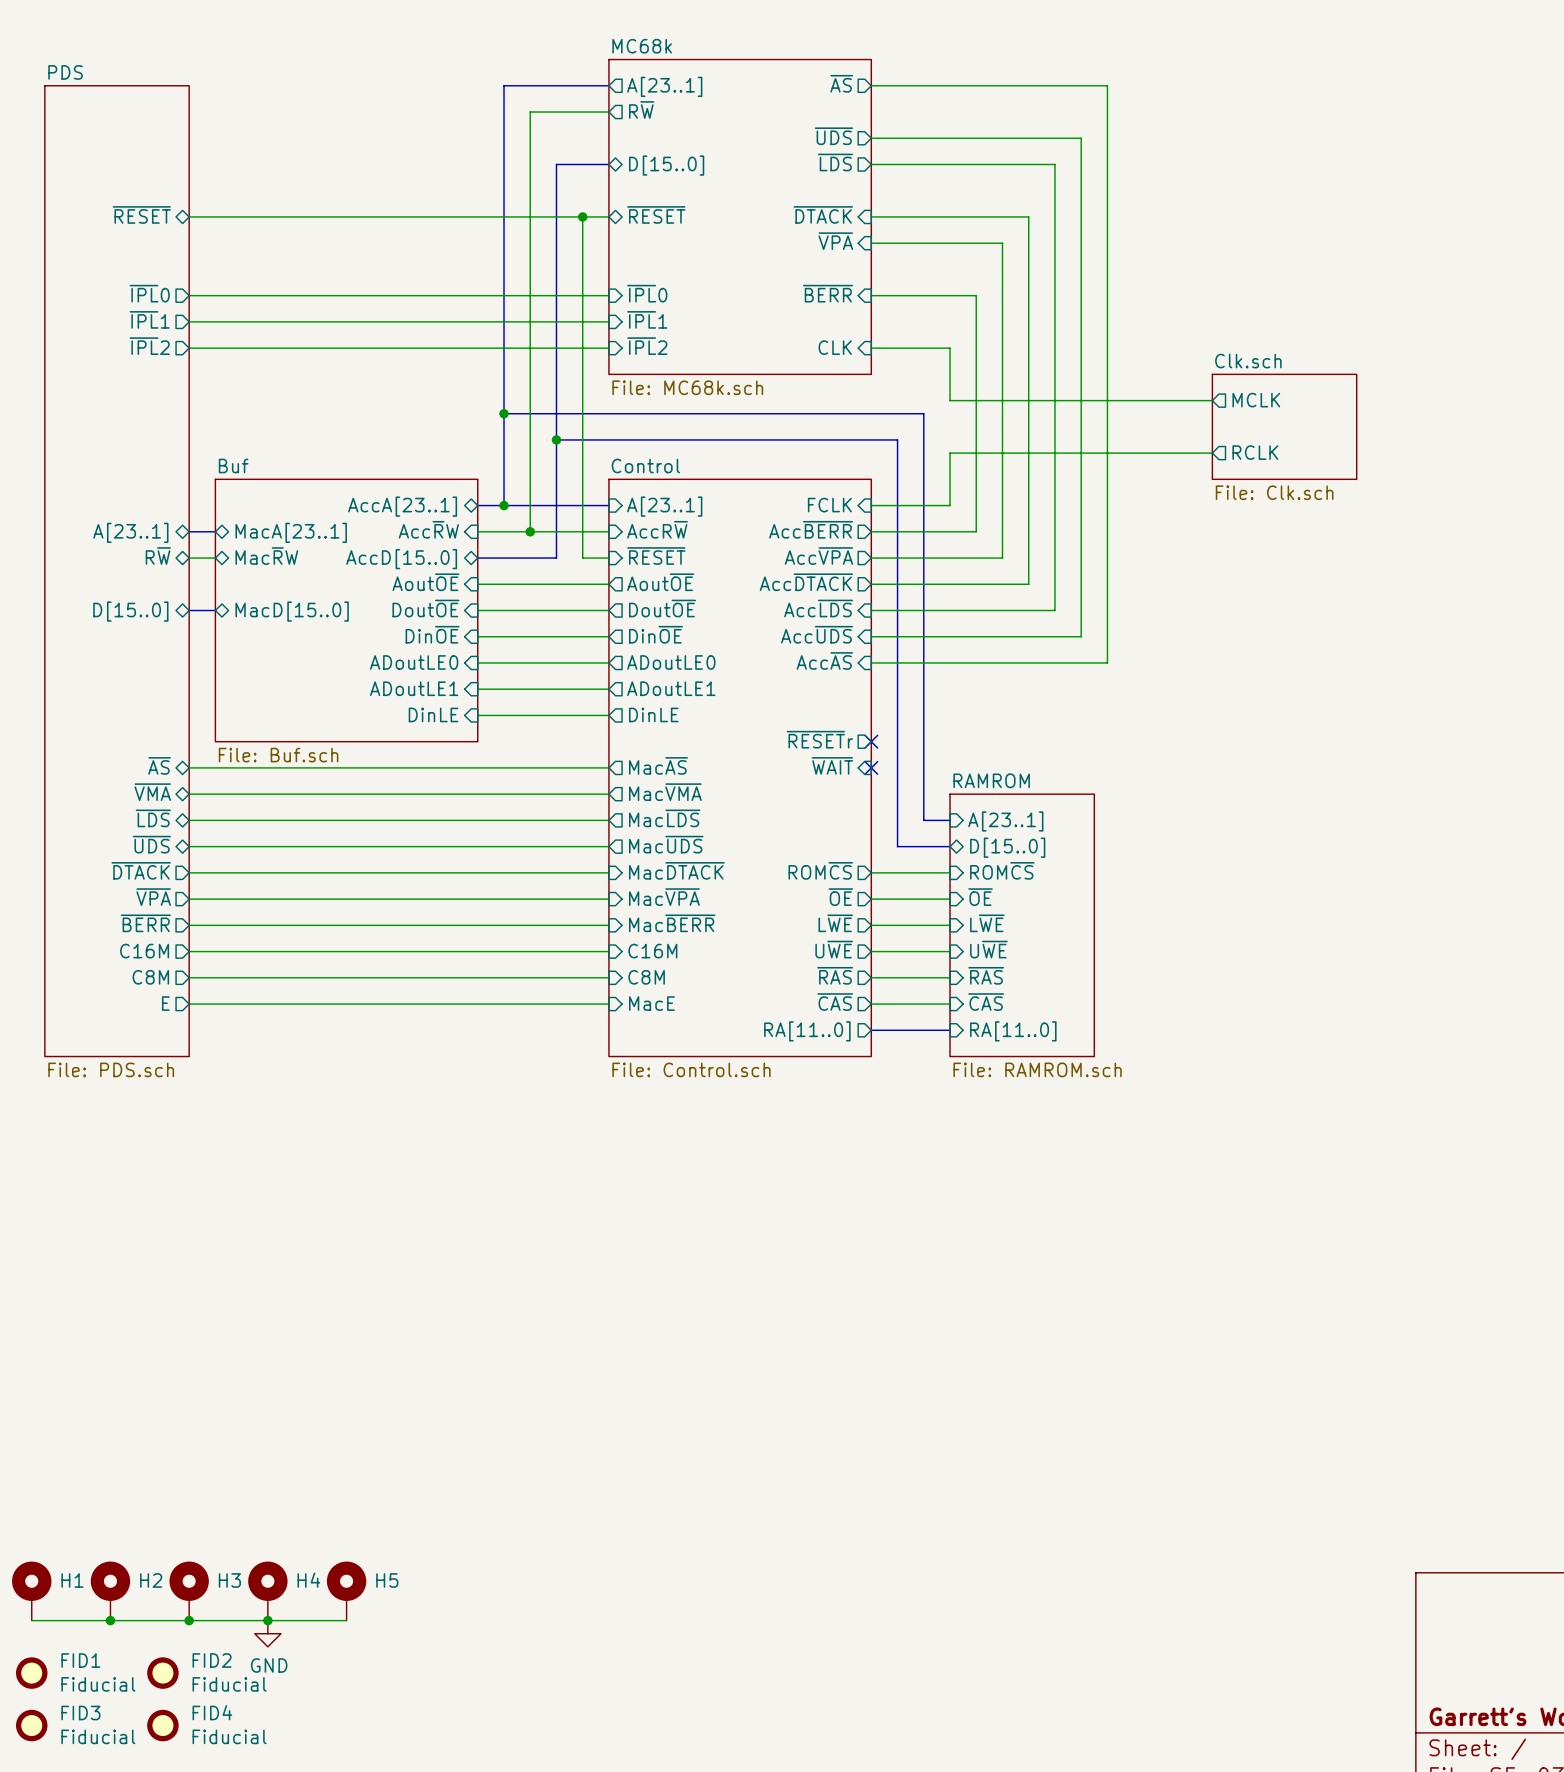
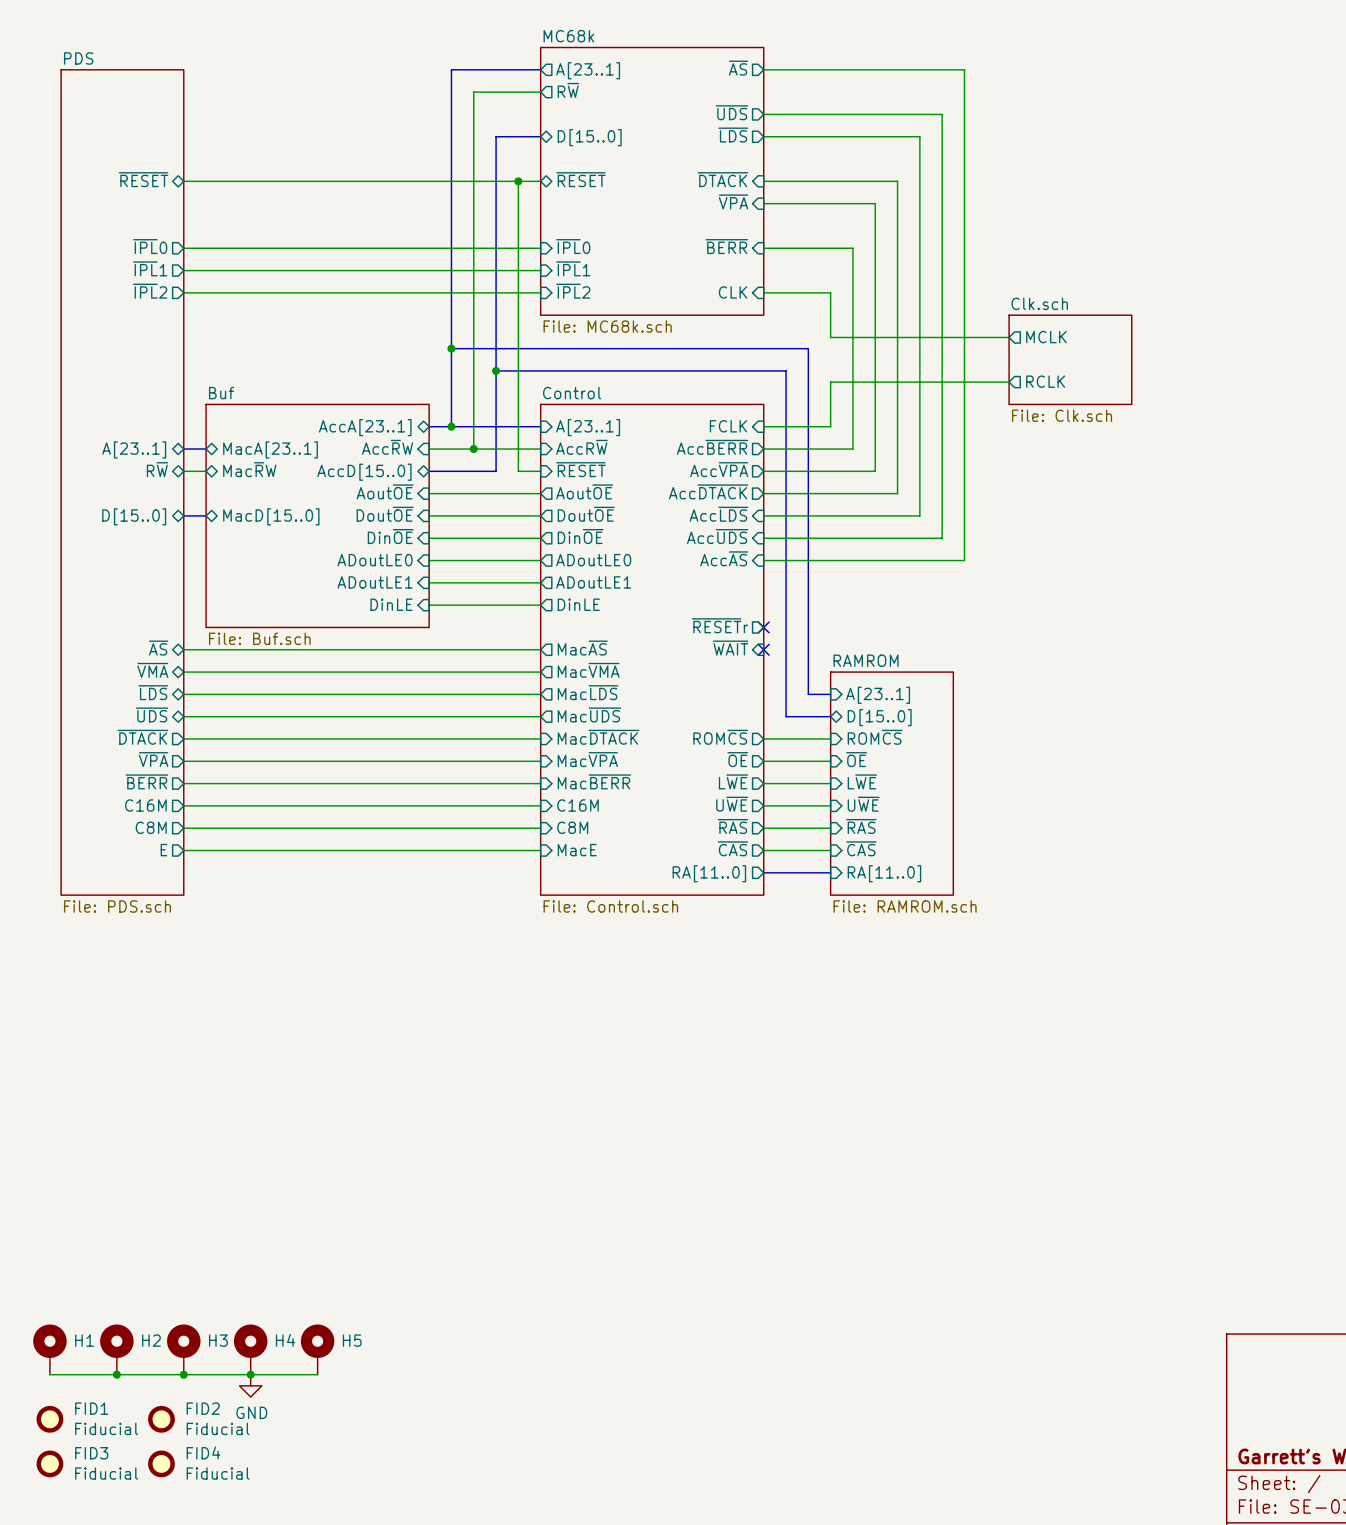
wire: (1159, 400) (1212, 400) -> none
sheet pin position: MCLK (1256, 400) -> MCLK (1046, 337)
sheet Clk.sch position: (1284, 426) -> (1070, 359)
sheet pin position: RCLK (1255, 452) -> RCLK (1045, 381)
wire: (1159, 453) (1212, 453) -> none

